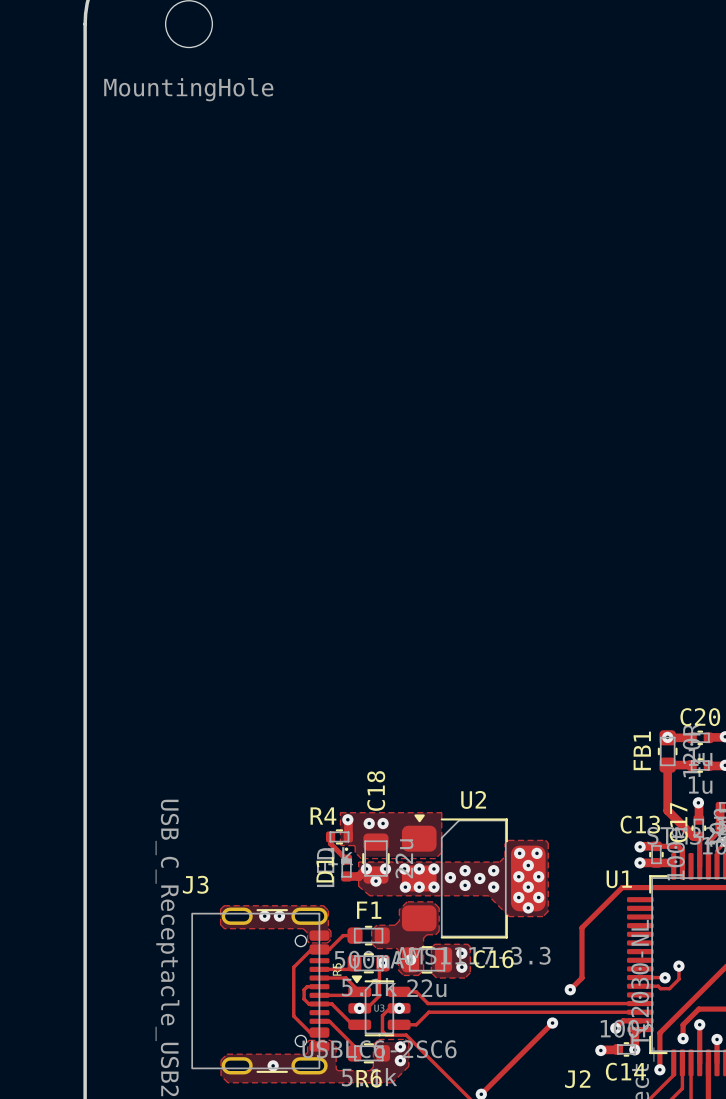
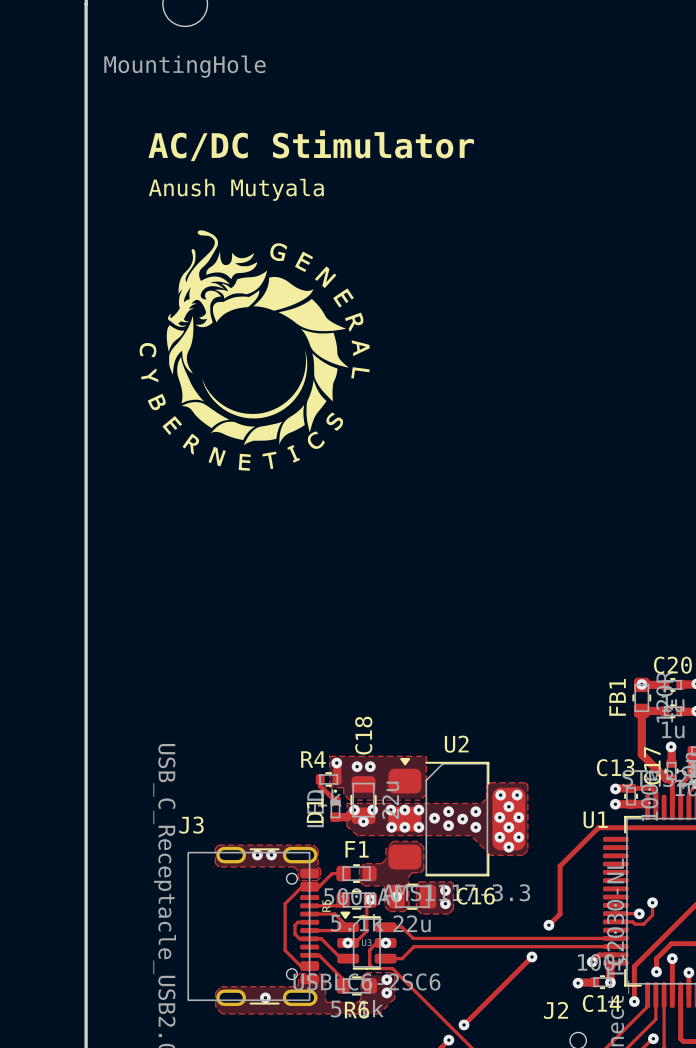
text: none -> AC/DC Stimulator (311, 145)
text: none -> Anush Mutyala (236, 189)
drawing: none -> [139, 230, 370, 471]

